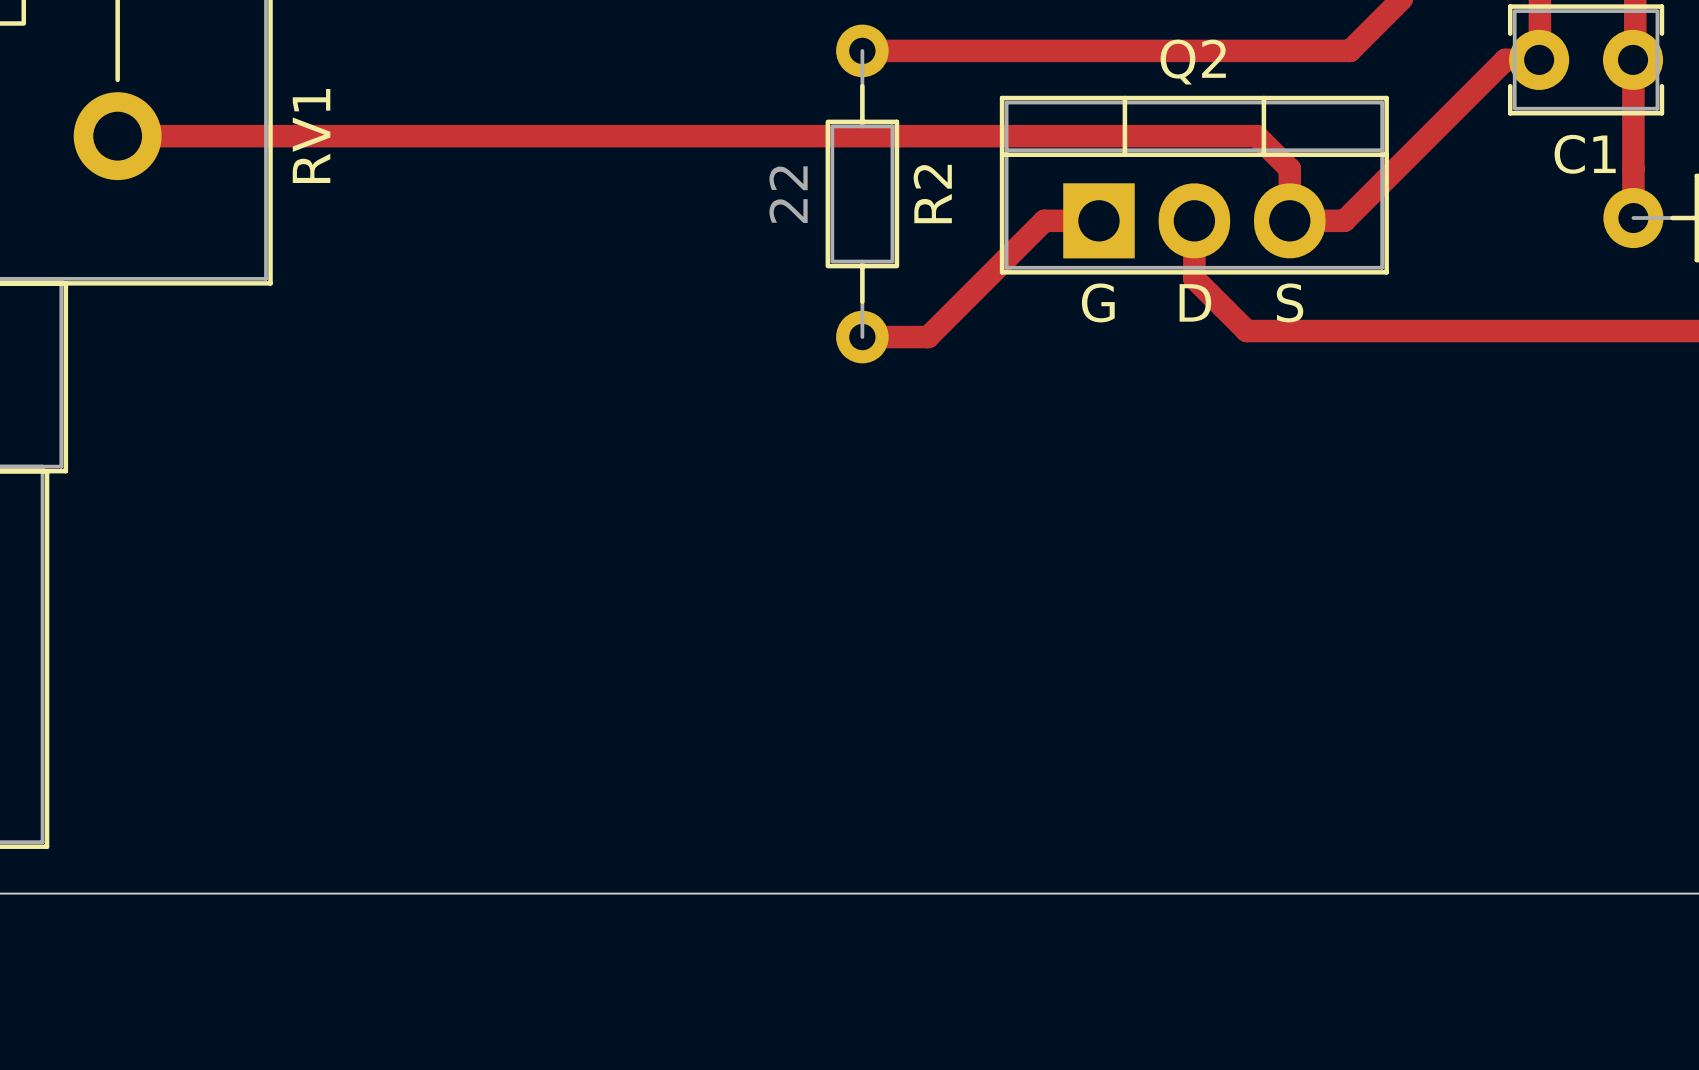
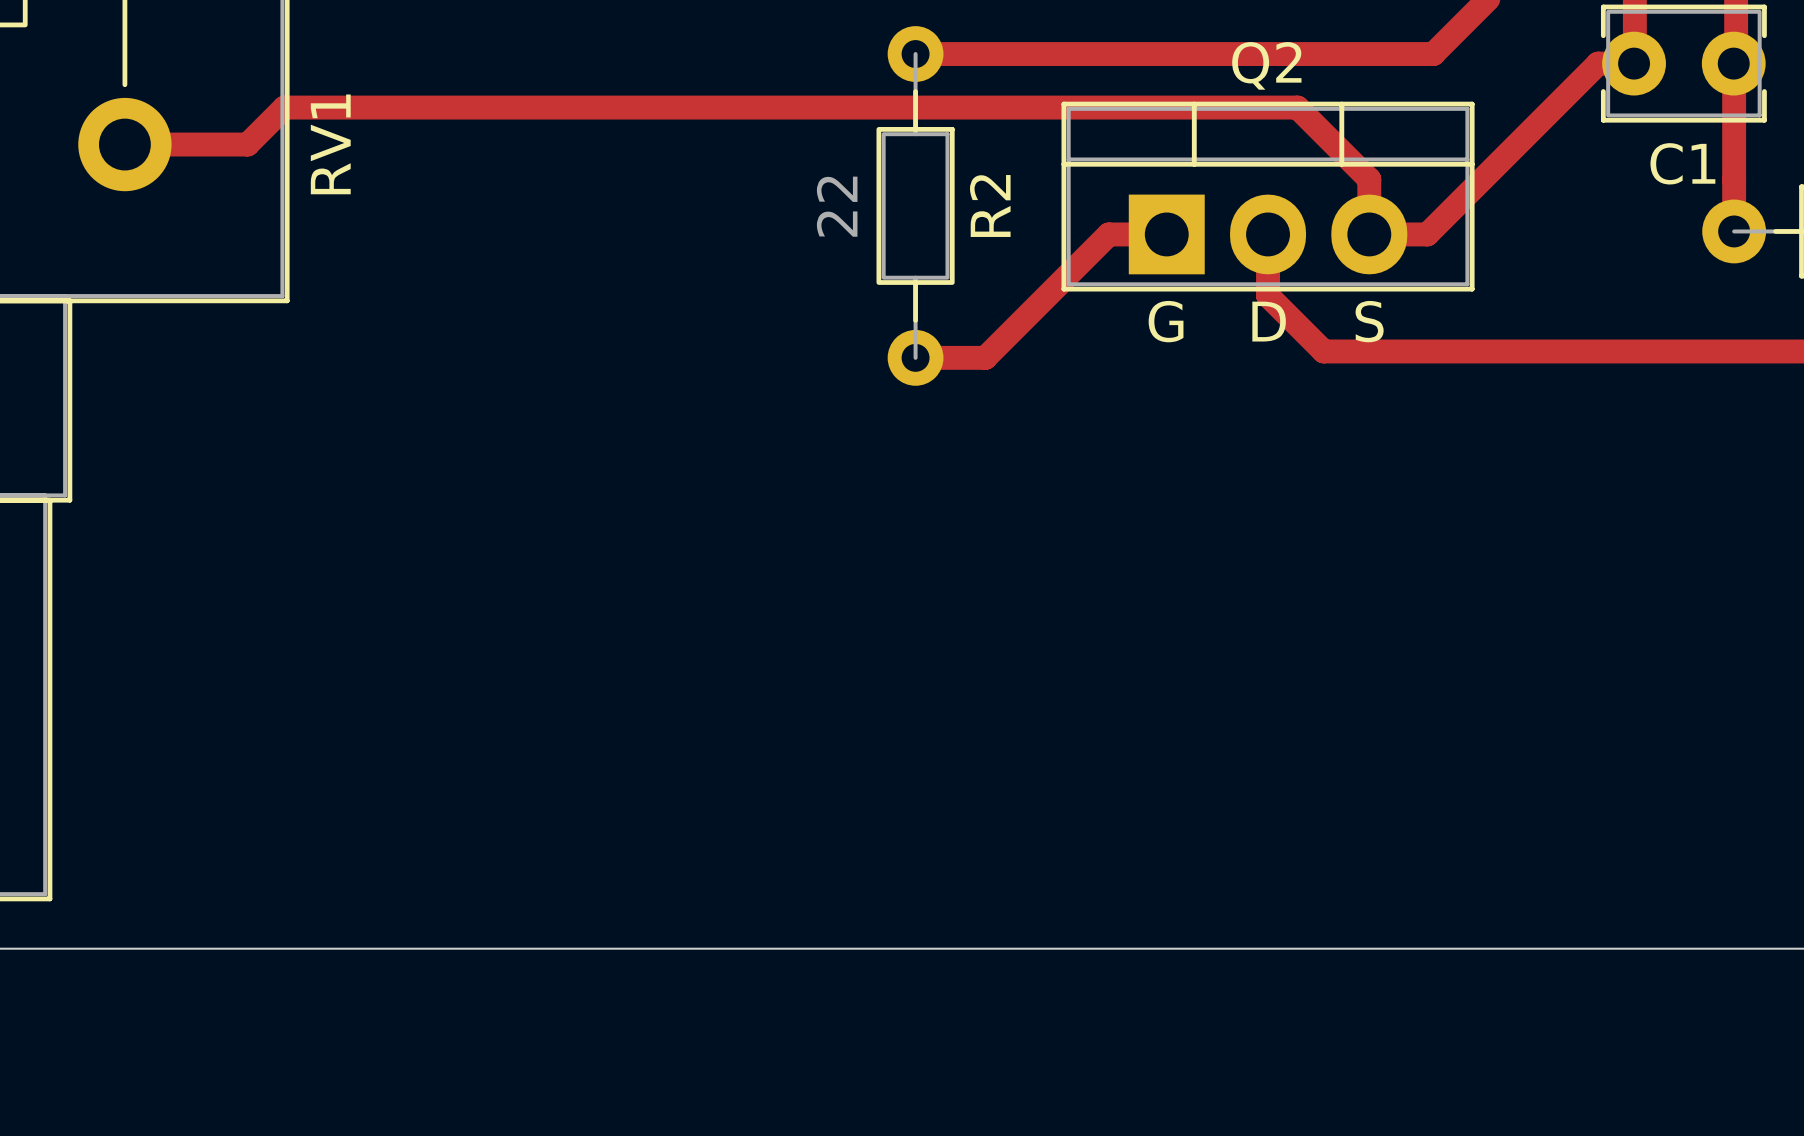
top track: (233, 136) (1257, 136) -> (247, 144) (284, 107) (1297, 107) (1334, 144)

